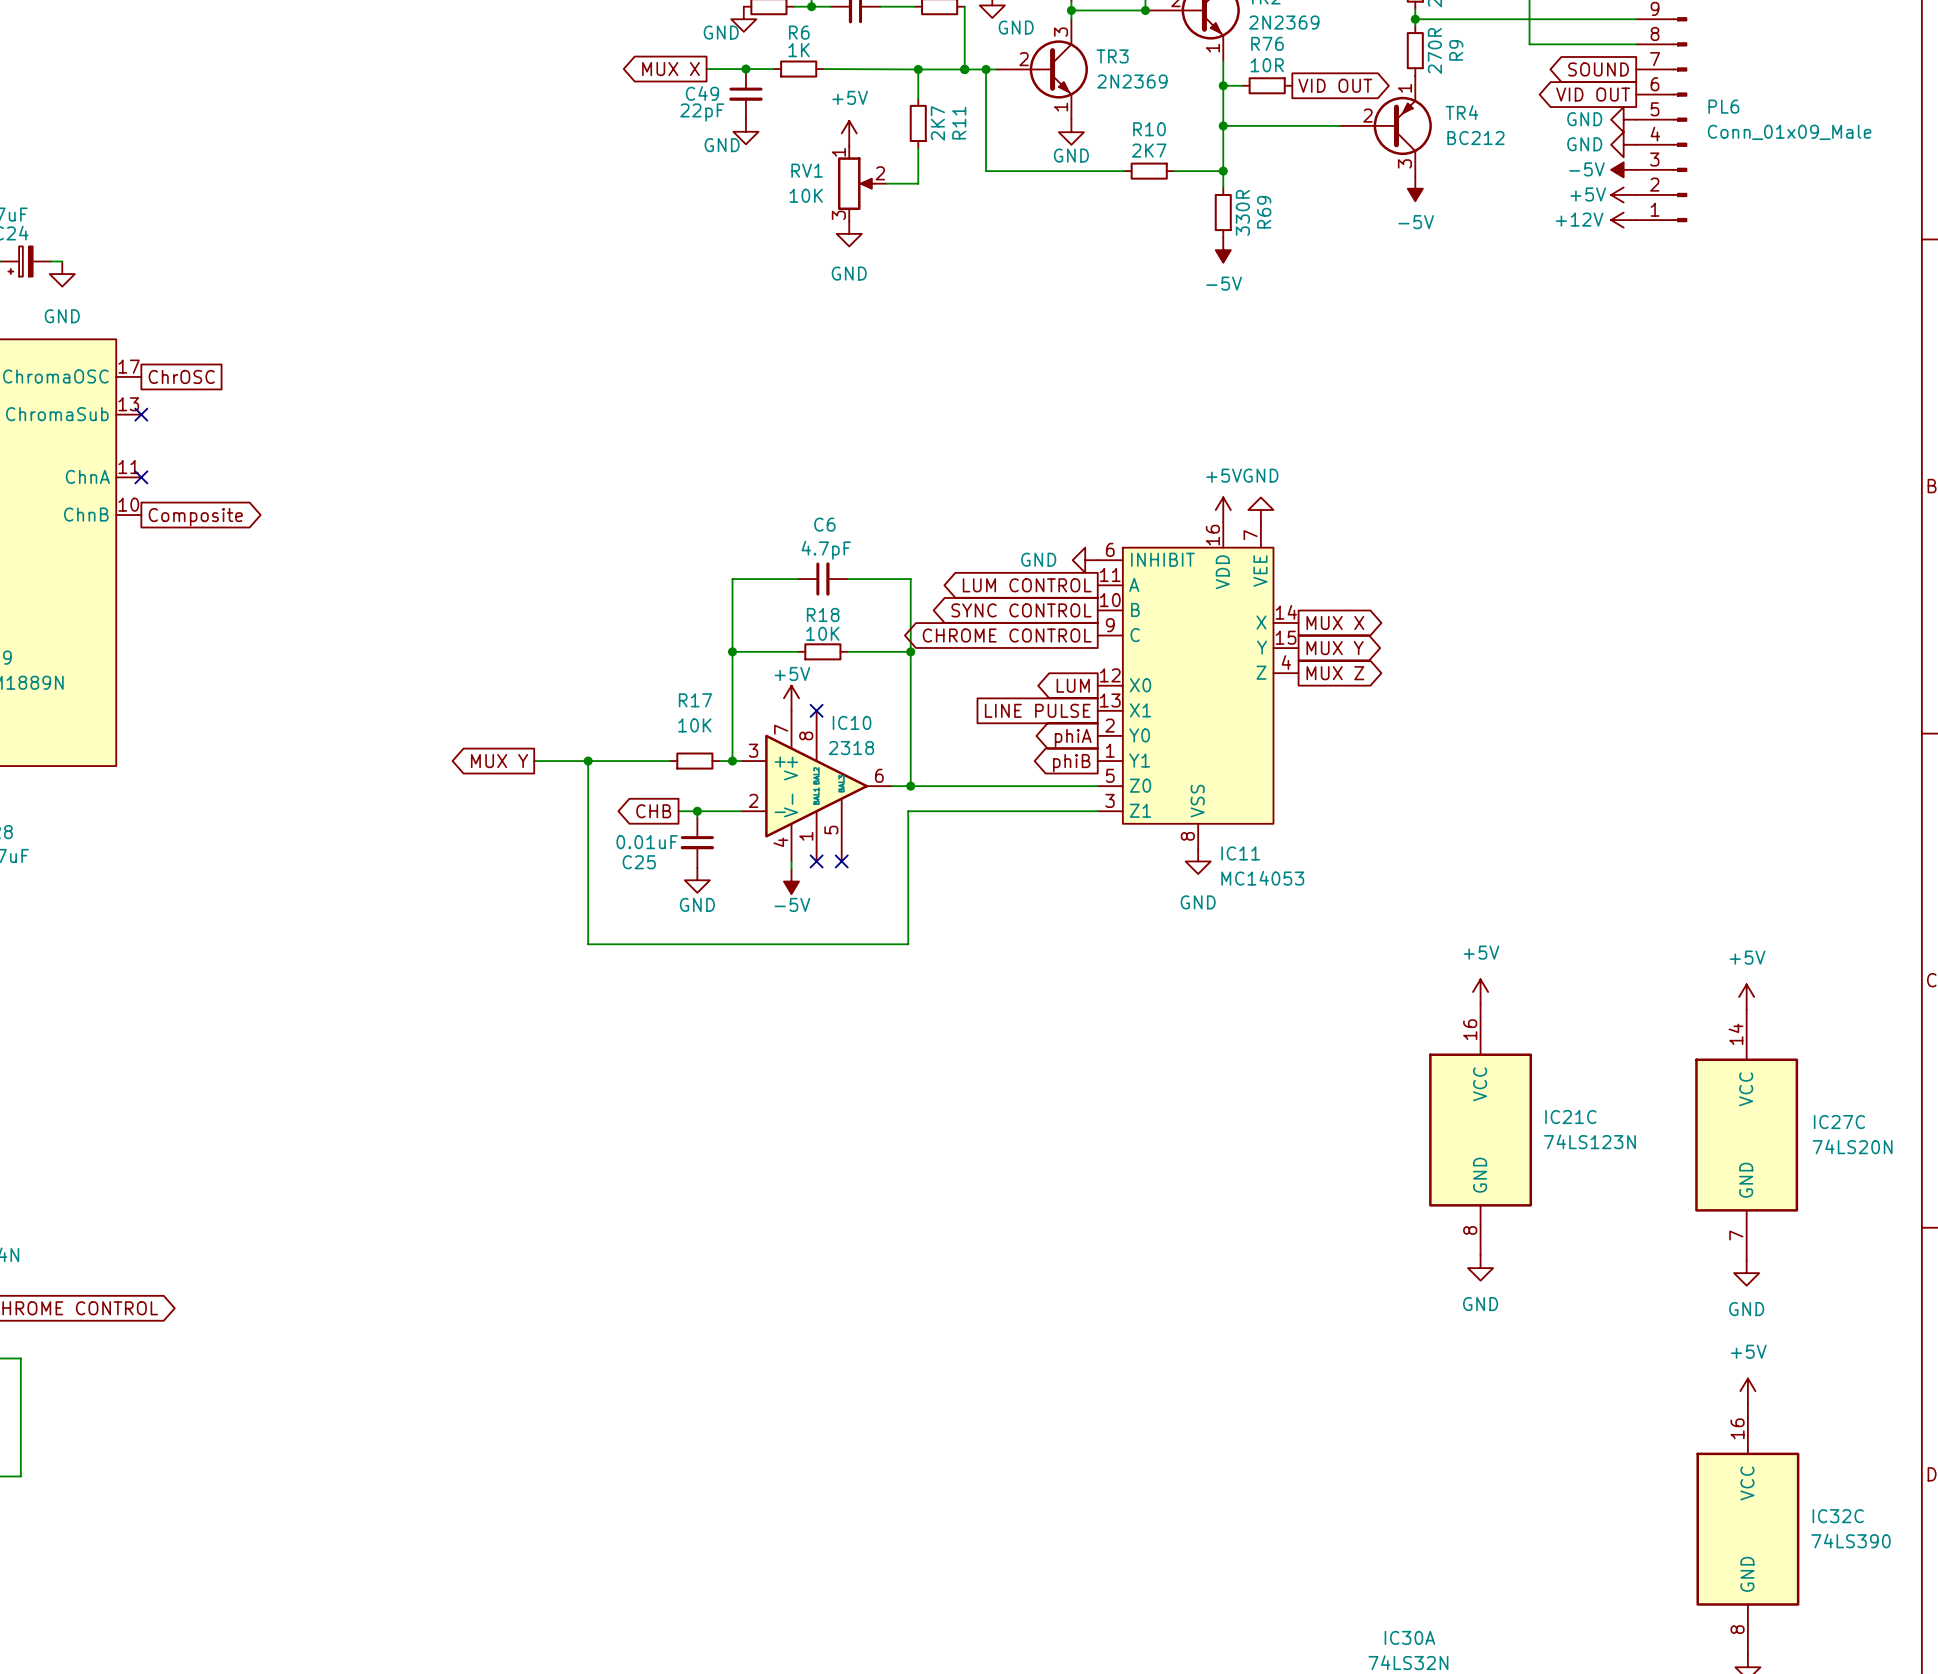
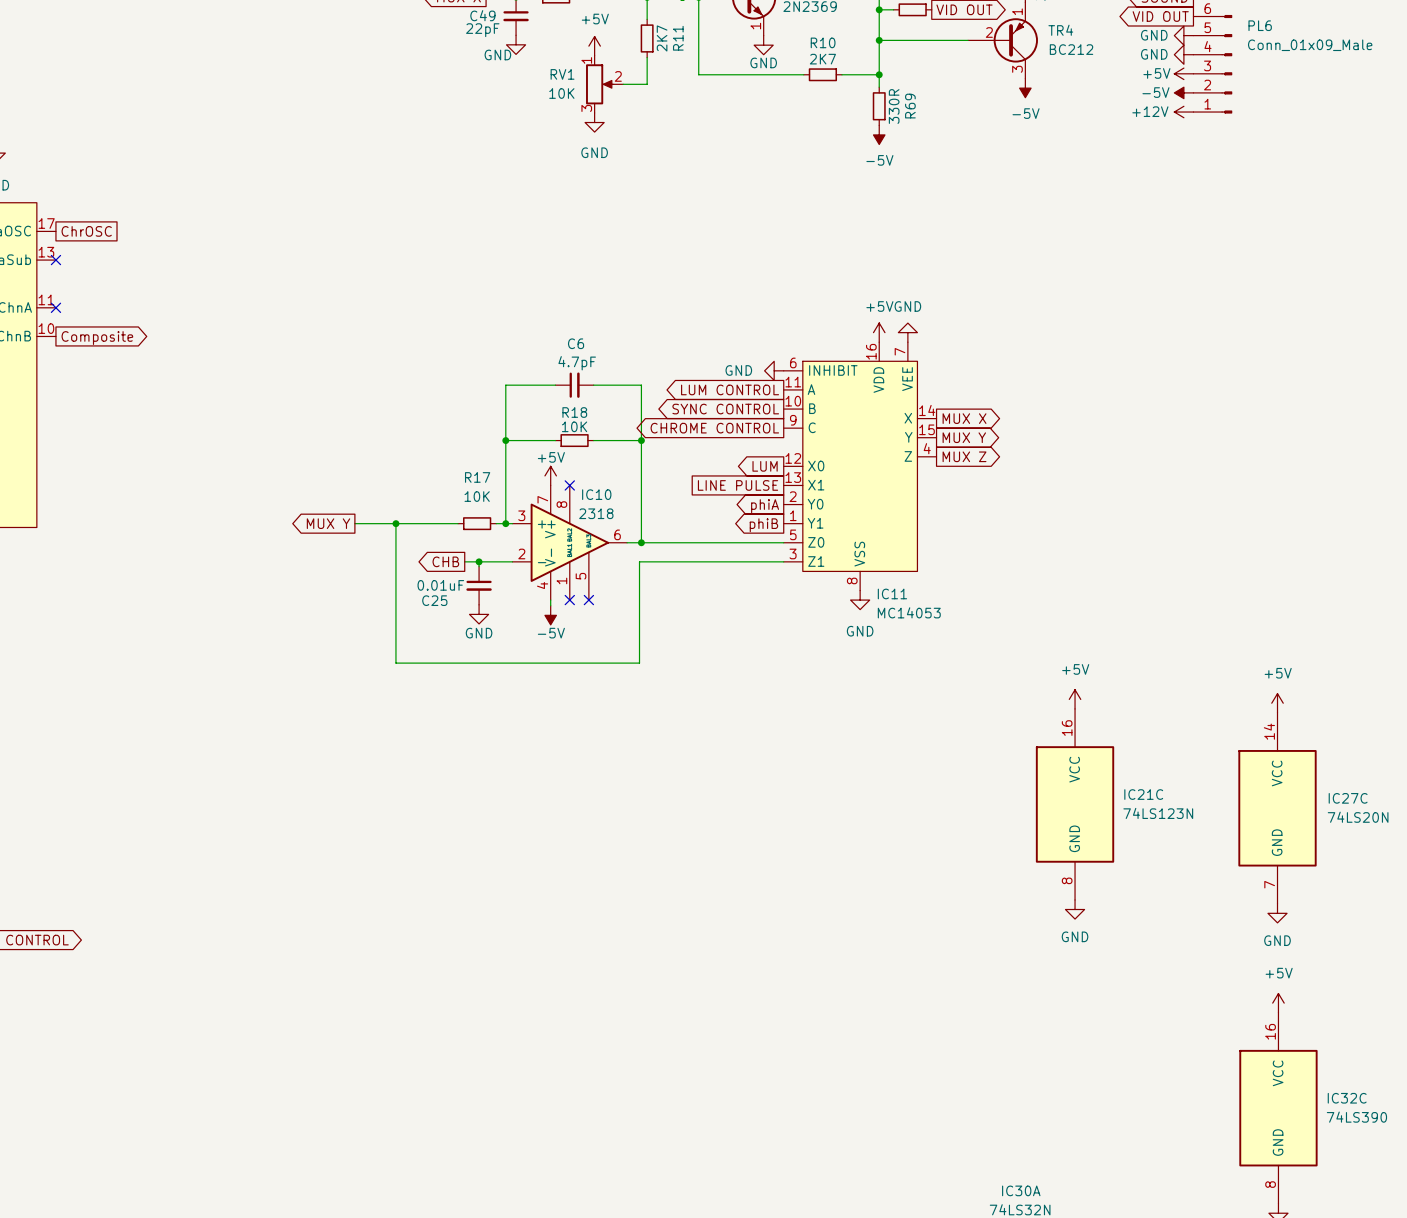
power symbol: -5V (1623, 169) -> +5V (1183, 73)
power symbol: +5V (1623, 194) -> -5V (1183, 92)

